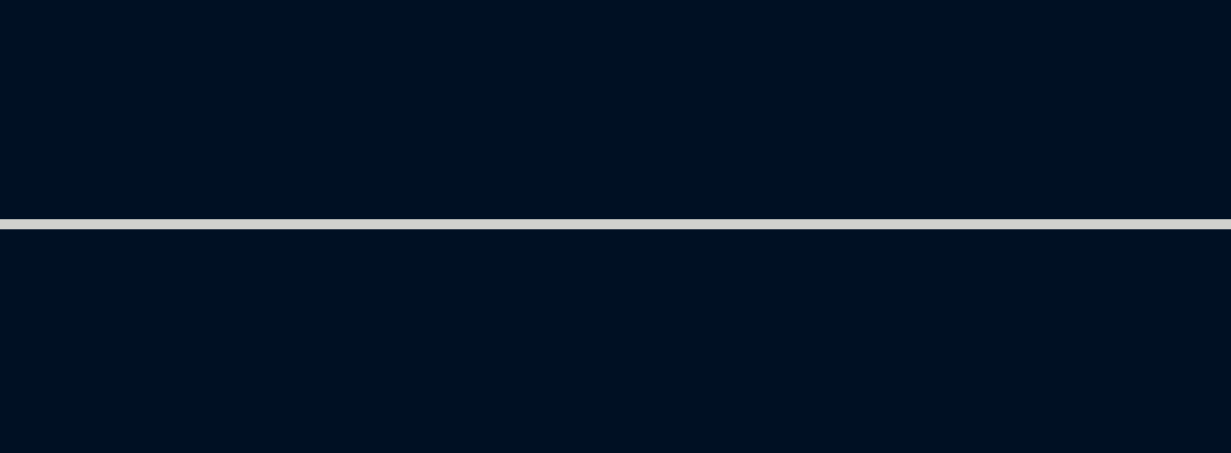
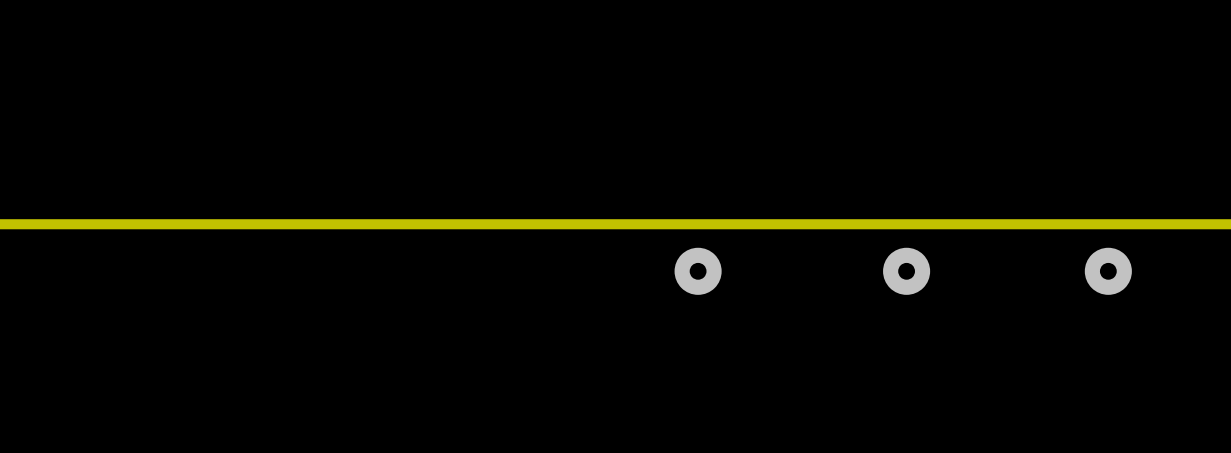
via: none -> (698, 271)
via: none -> (906, 271)
via: none -> (1108, 271)

